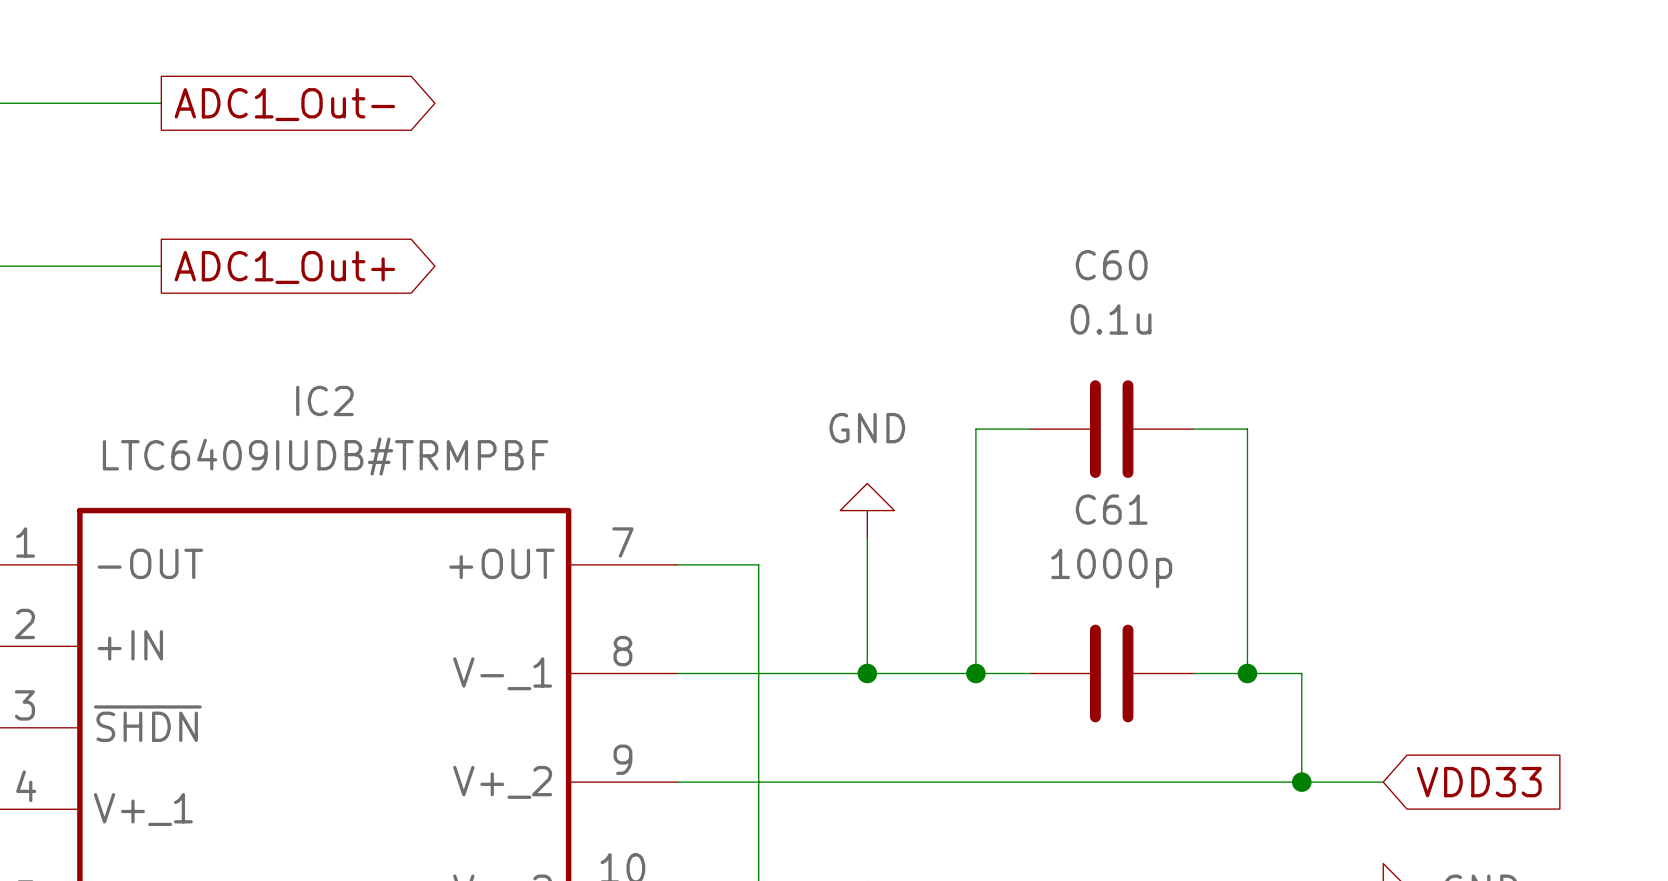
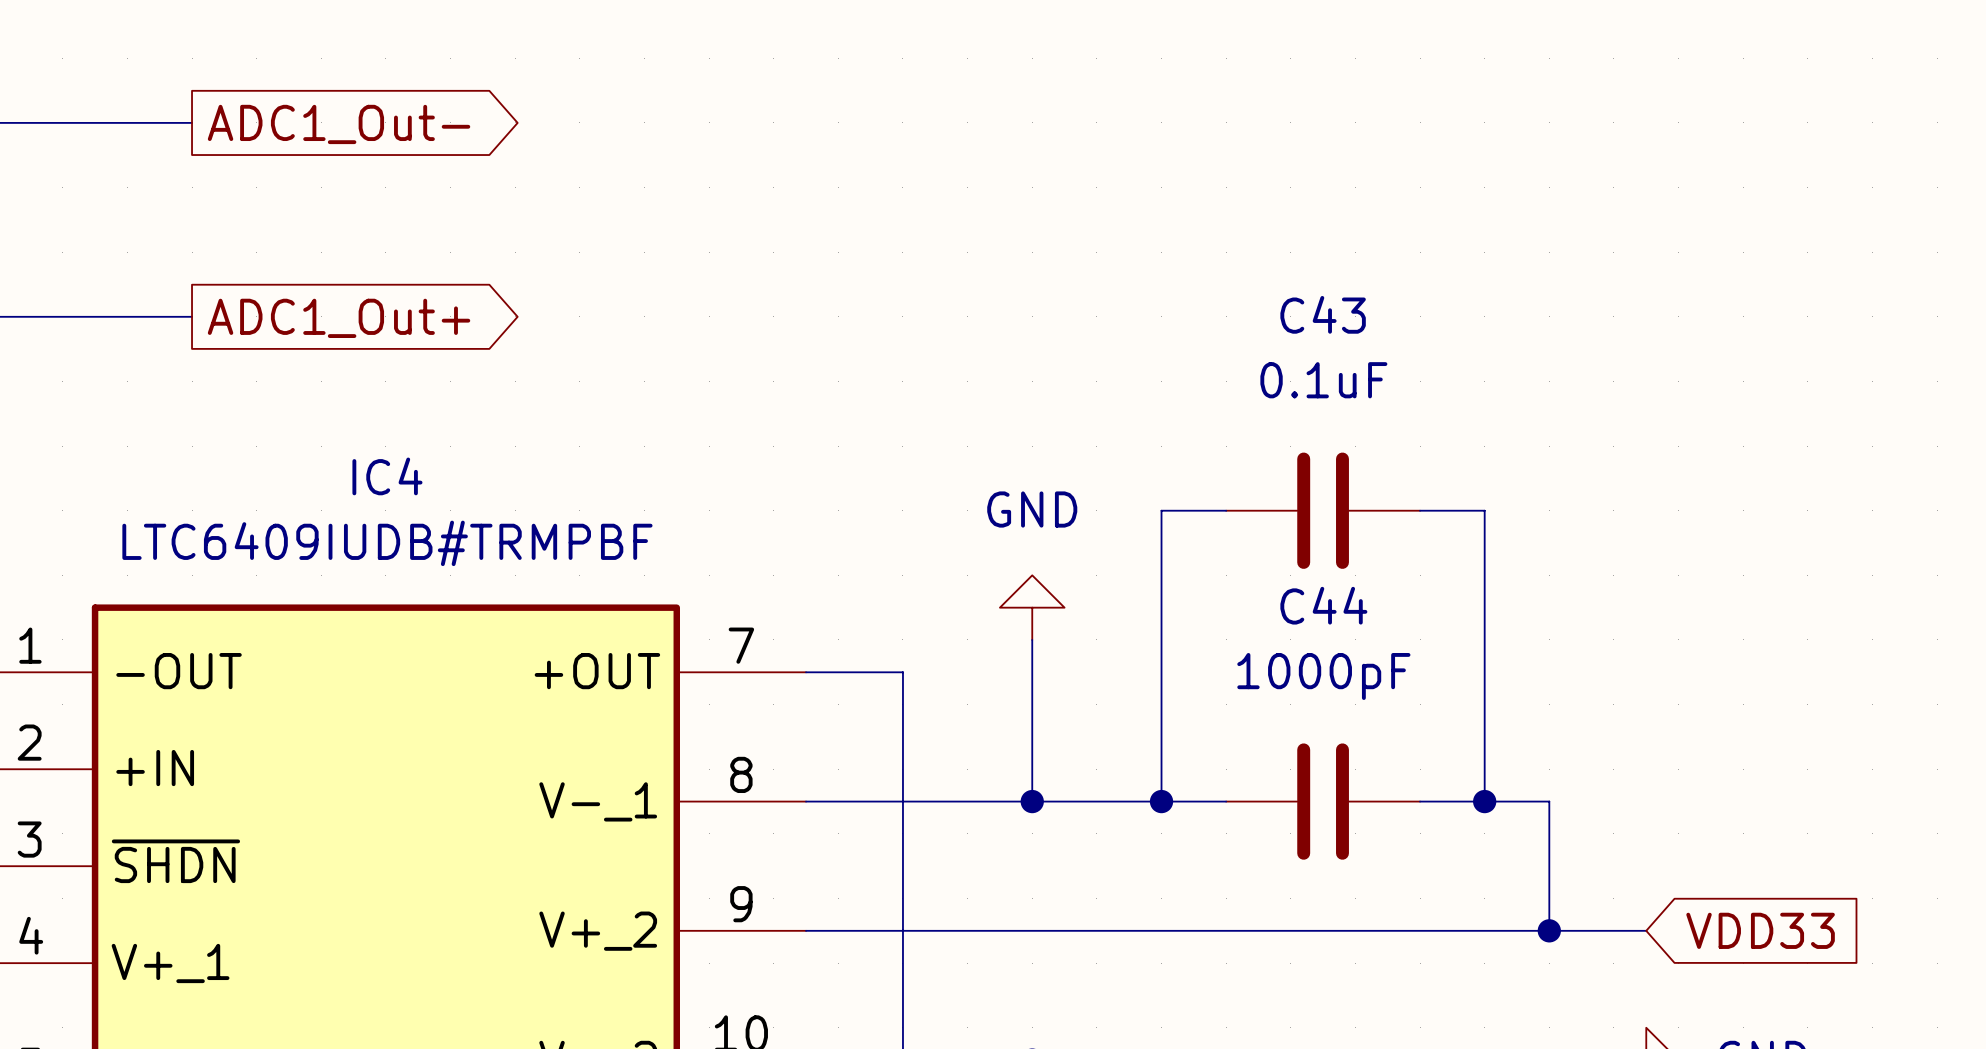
C60 name: C60 (1111, 265) -> C43 (1323, 314)
C60 value: 0.1u (1111, 319) -> 0.1uF (1323, 380)
IC2 name: IC2 (324, 400) -> IC4 (387, 476)
C61 name: C61 (1111, 509) -> C44 (1323, 605)
C61 value: 1000p (1111, 568) -> 1000pF (1323, 676)

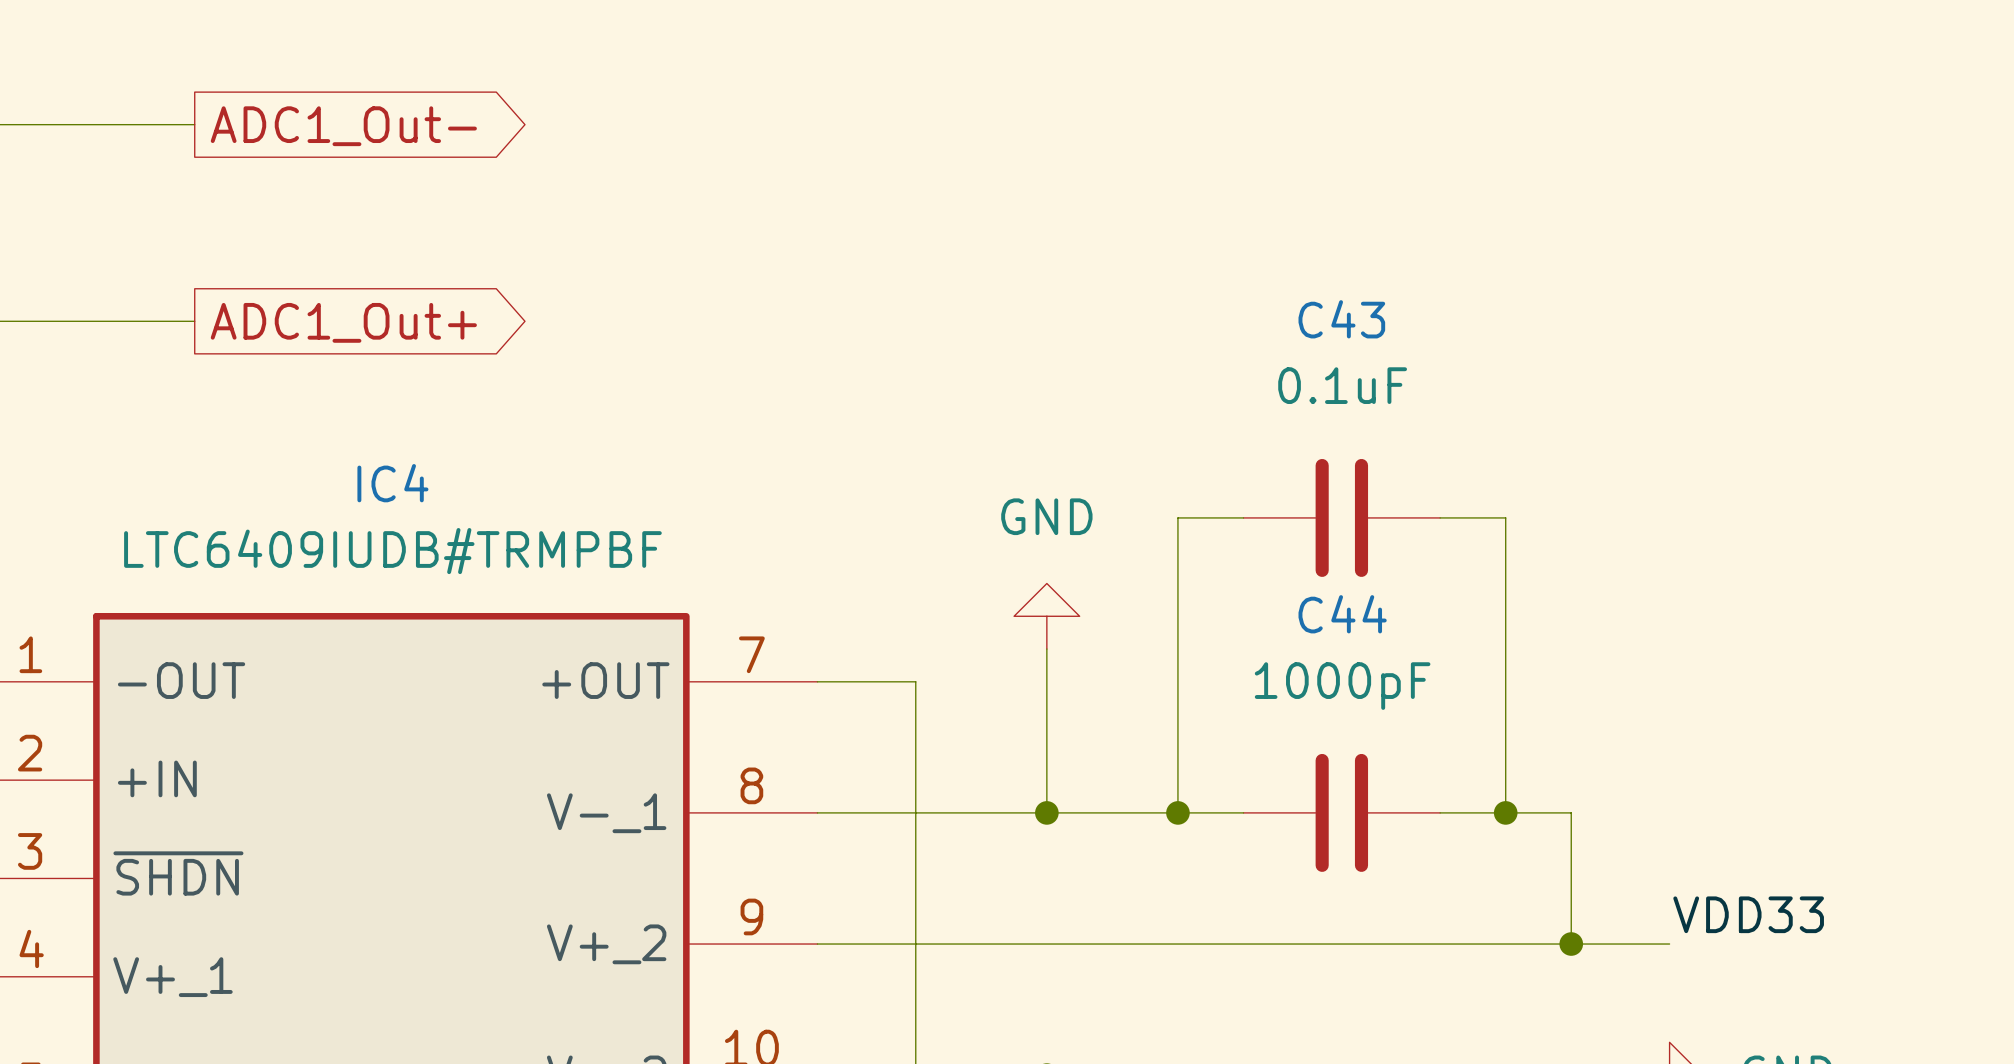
label: none -> VDD33 (1748, 914)
global label: VDD33 (1760, 930) -> none

